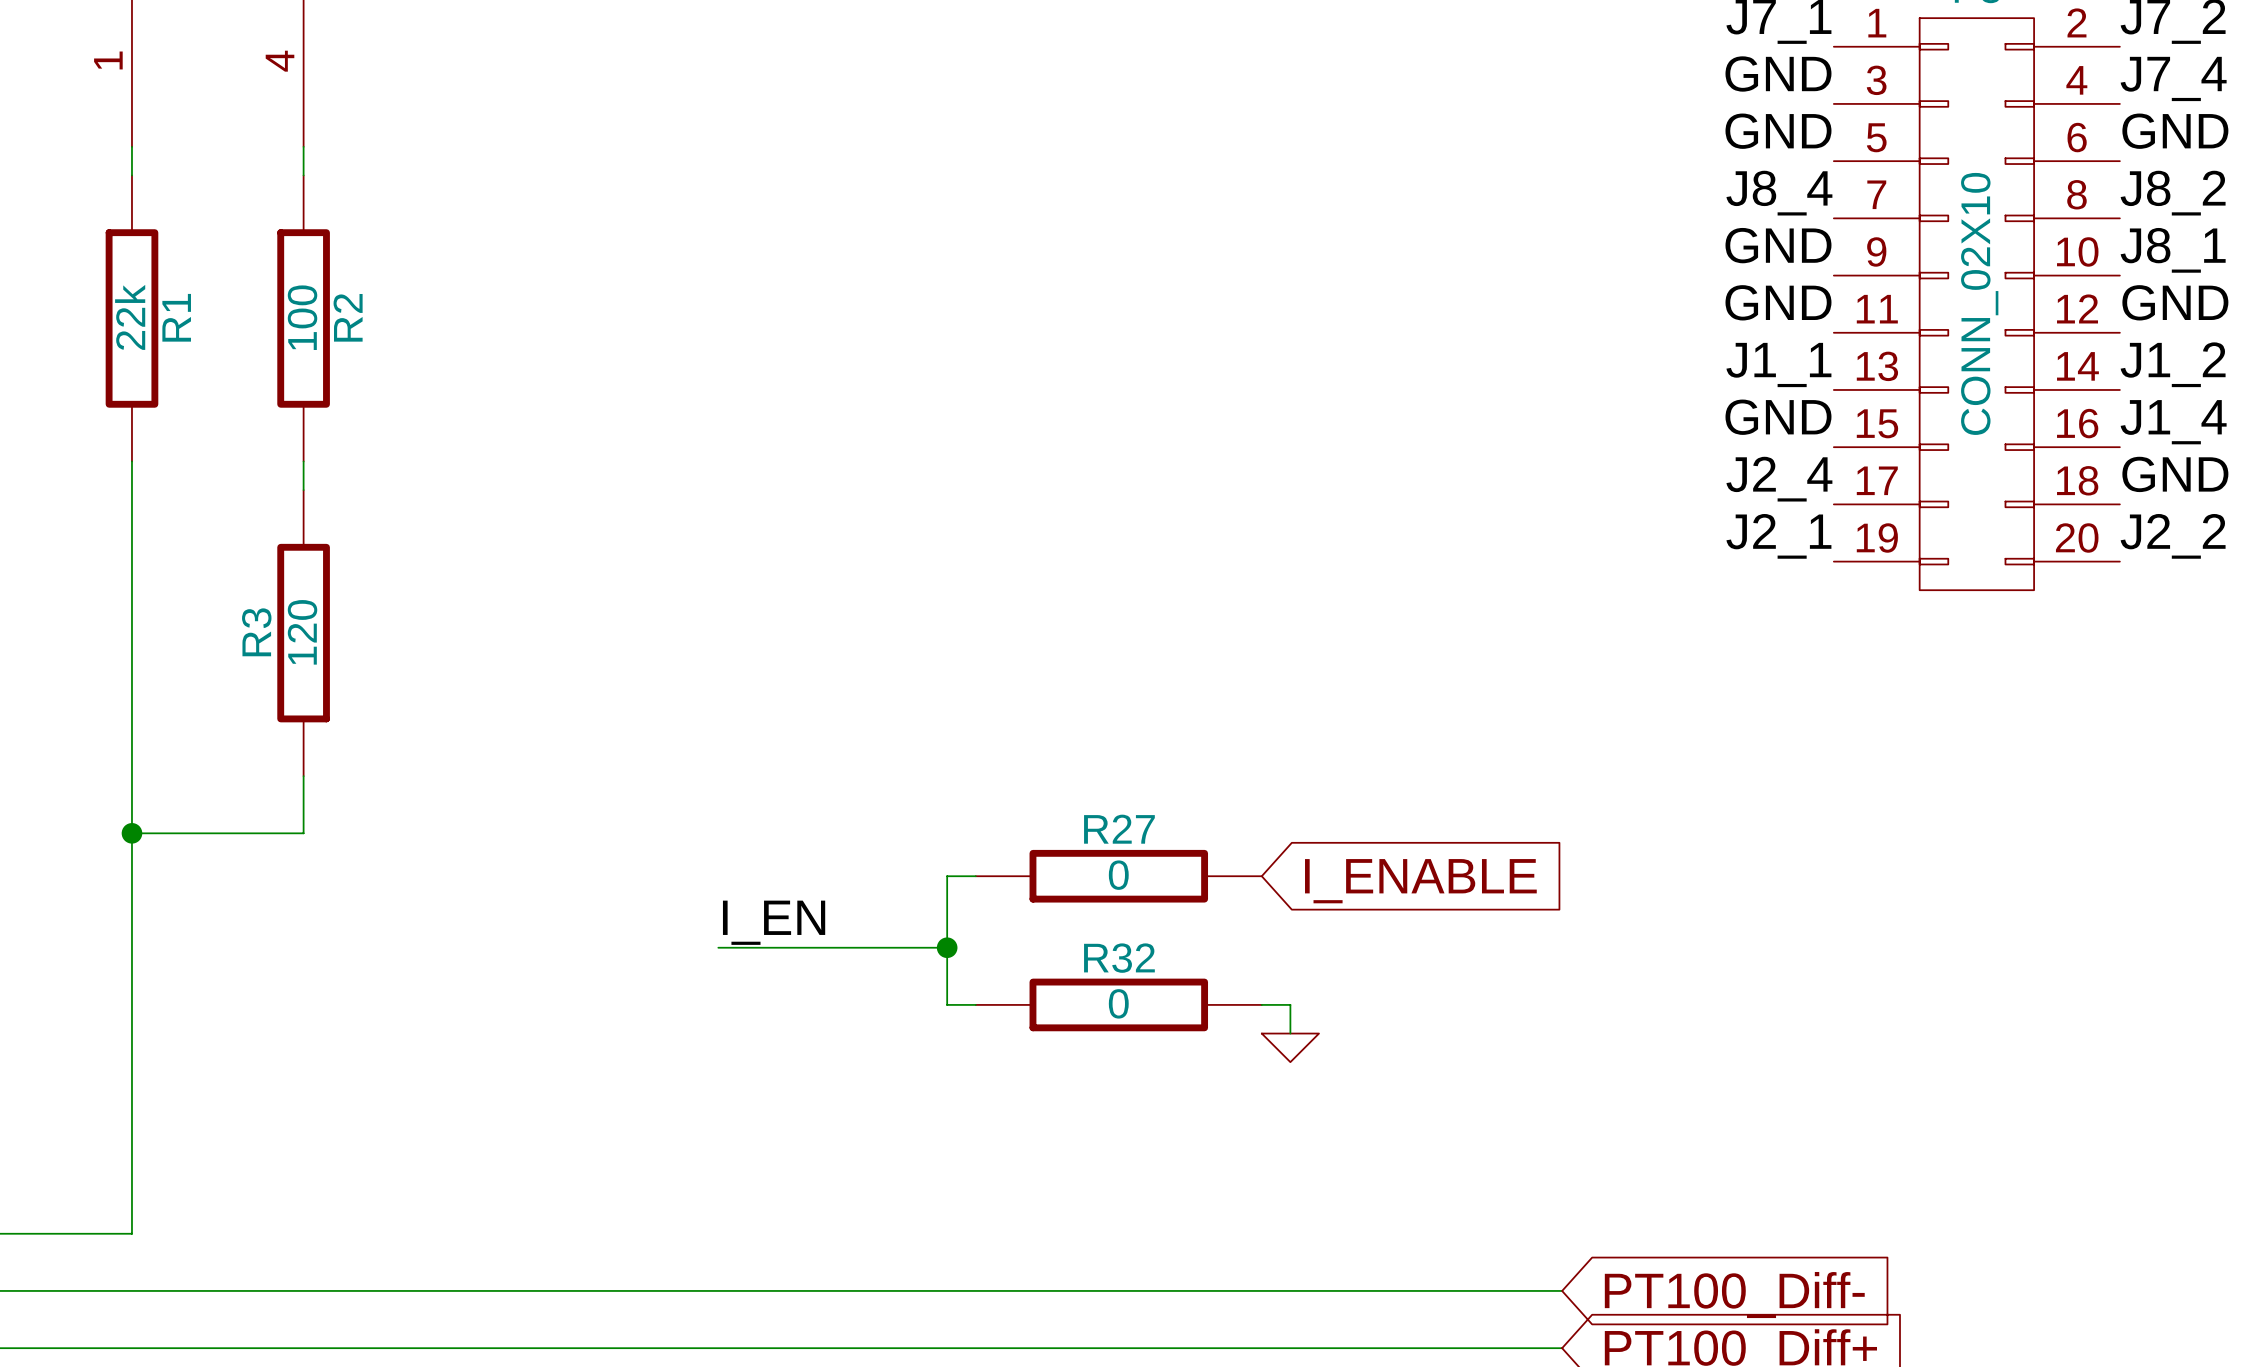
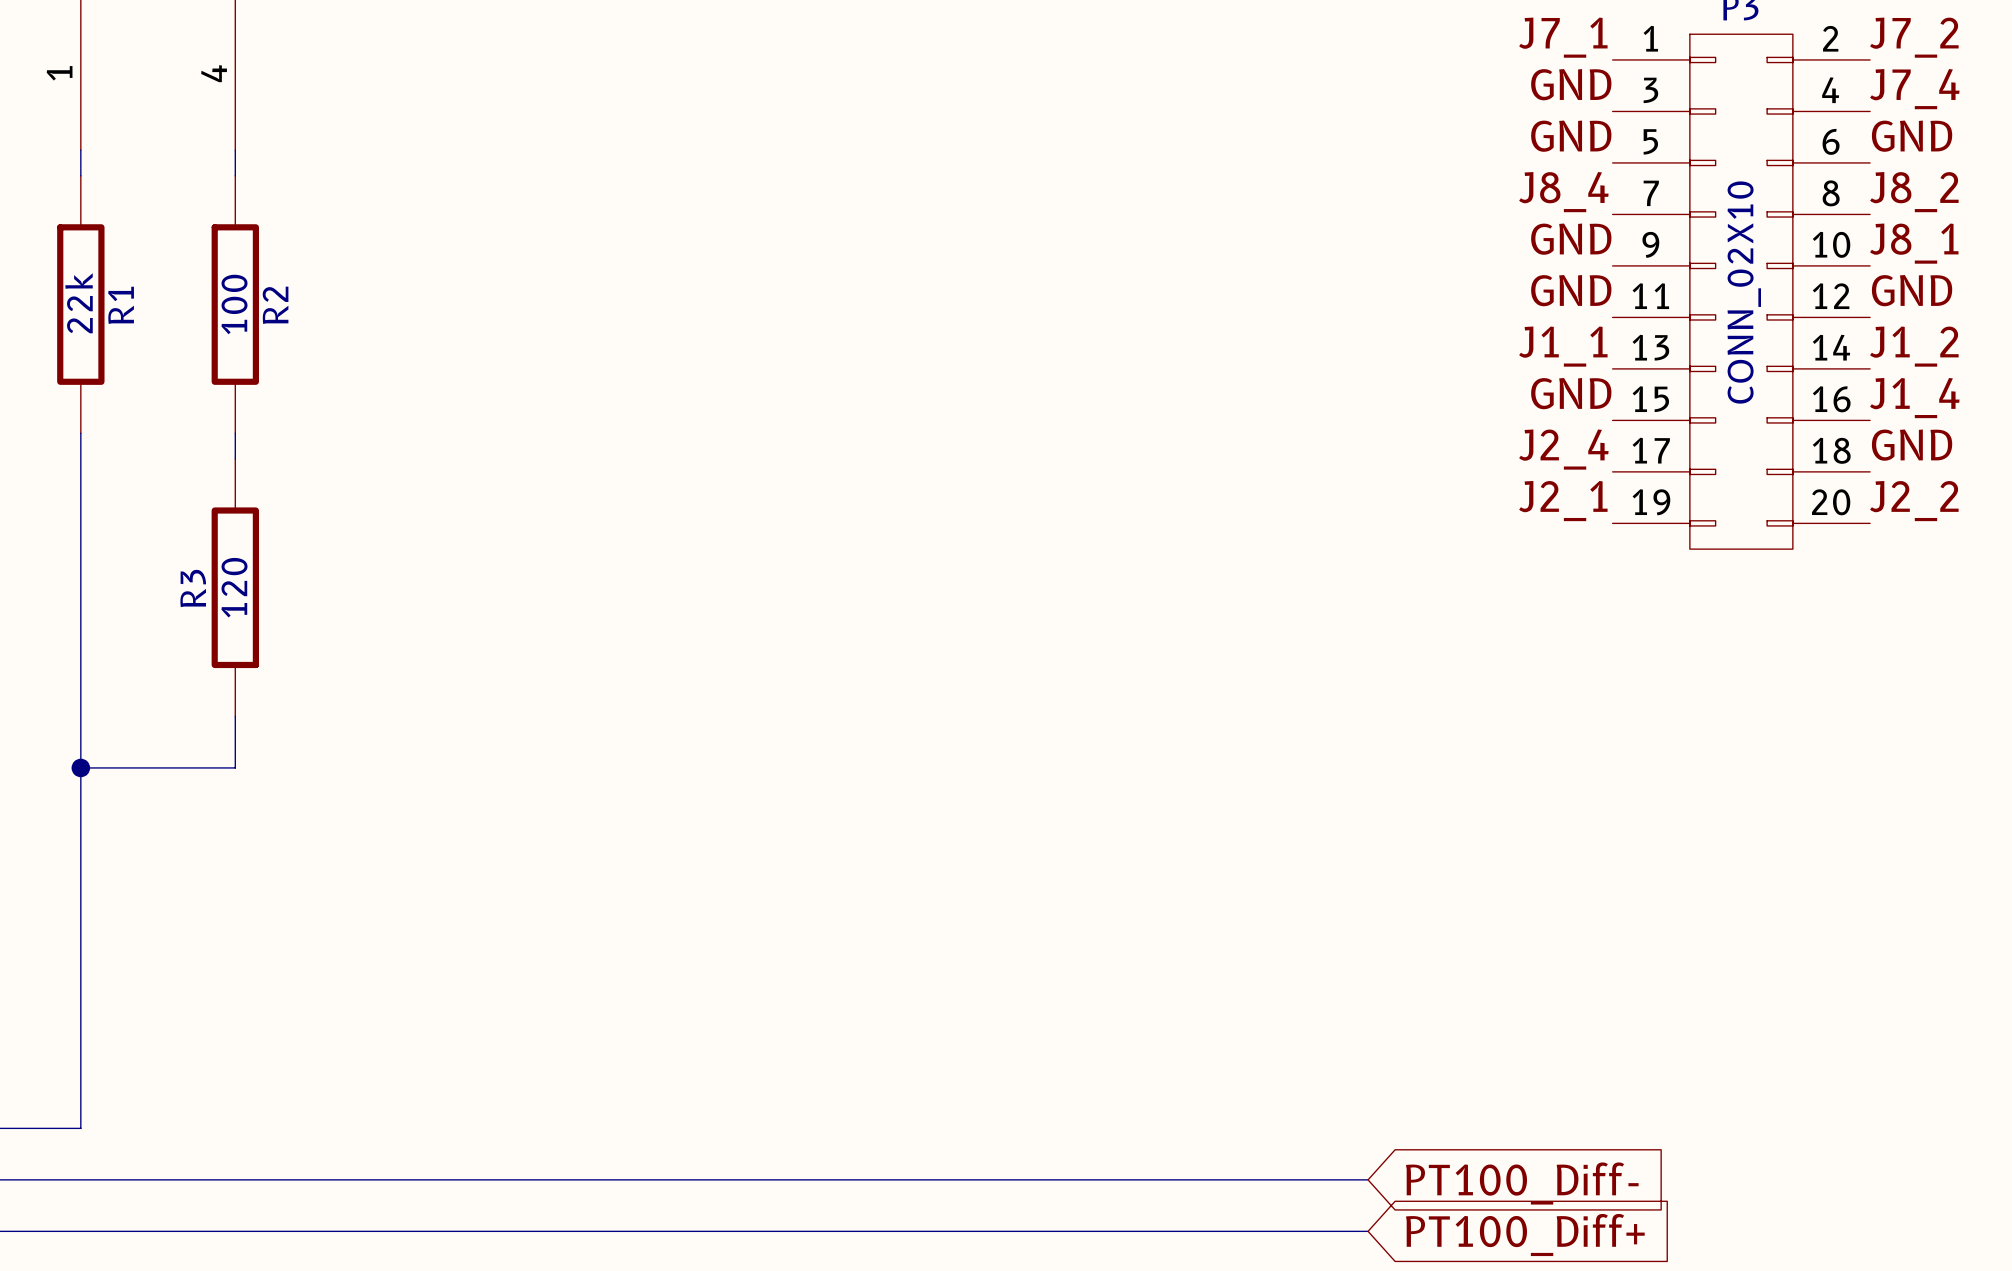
wire: (975, 876) (947, 876) (947, 1004) (975, 1004) -> none
R27: 0 (1118, 876) -> none
global label: I_ENABLE (1420, 881) -> none
label: I_EN (774, 922) -> none
wire: (718, 947) (947, 947) -> none
junction: (947, 947) -> none
R32: 0 (1118, 1004) -> none
wire: (1261, 1004) (1290, 1004) (1290, 1033) -> none
power symbol: (1290, 1047) -> none

